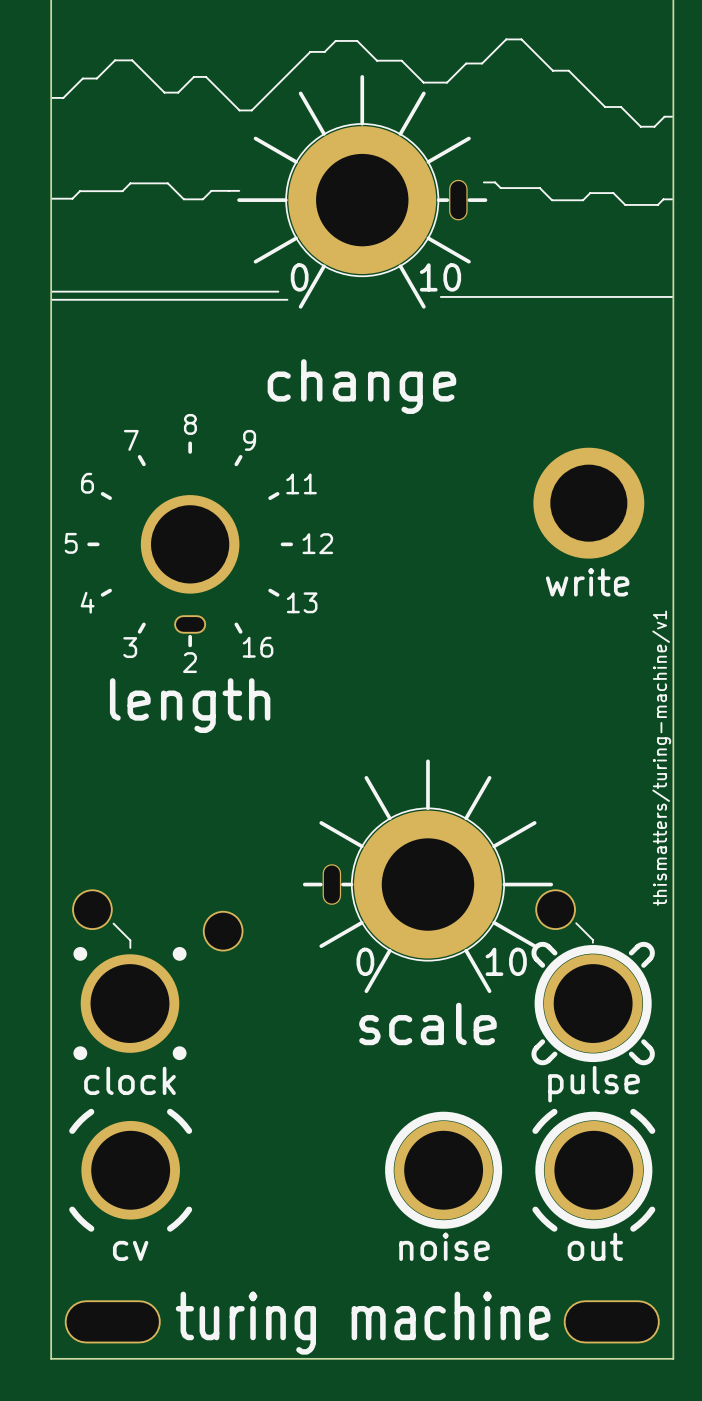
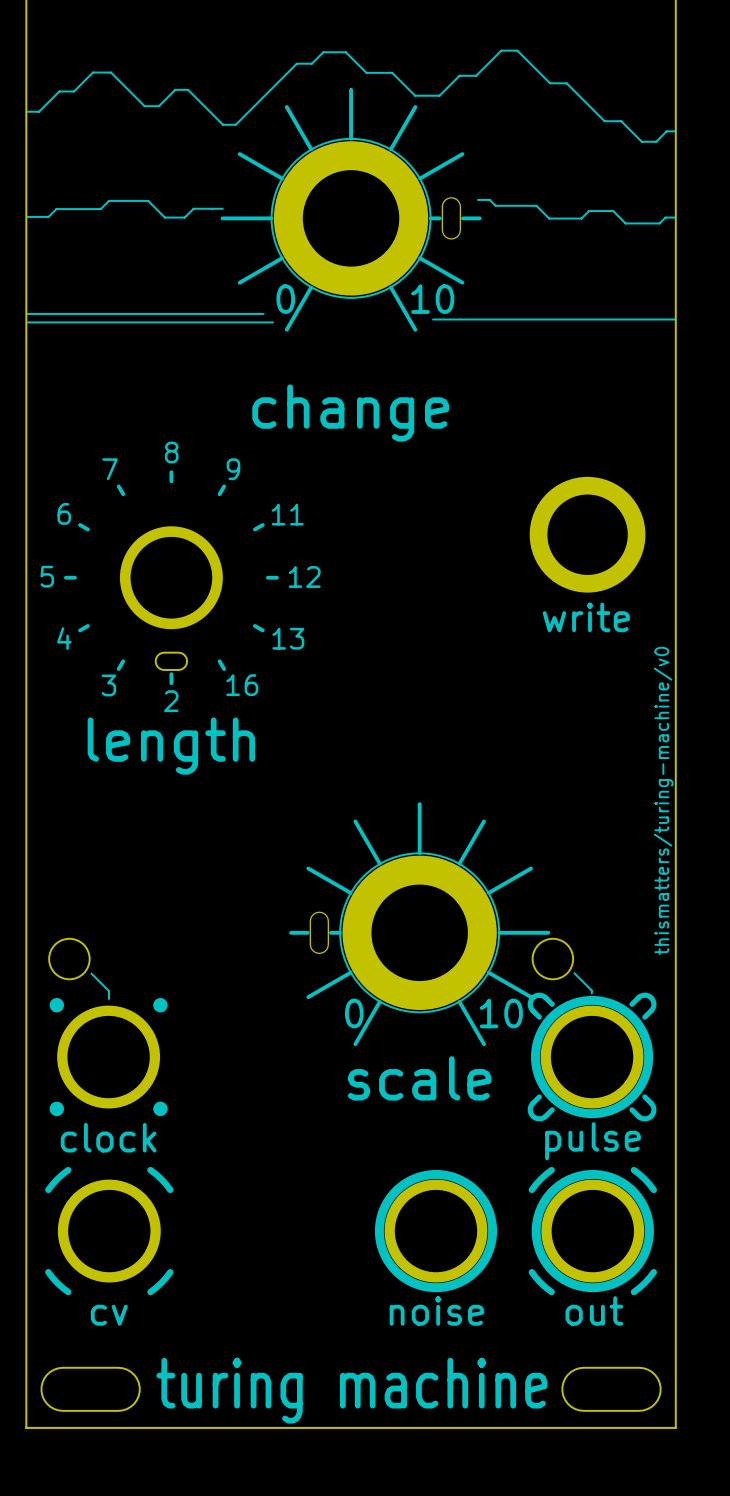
text: thismatters/turing-machine/v1 (661, 758) -> thismatters/turing-machine/v0 (663, 800)
part: (223, 931) -> none

